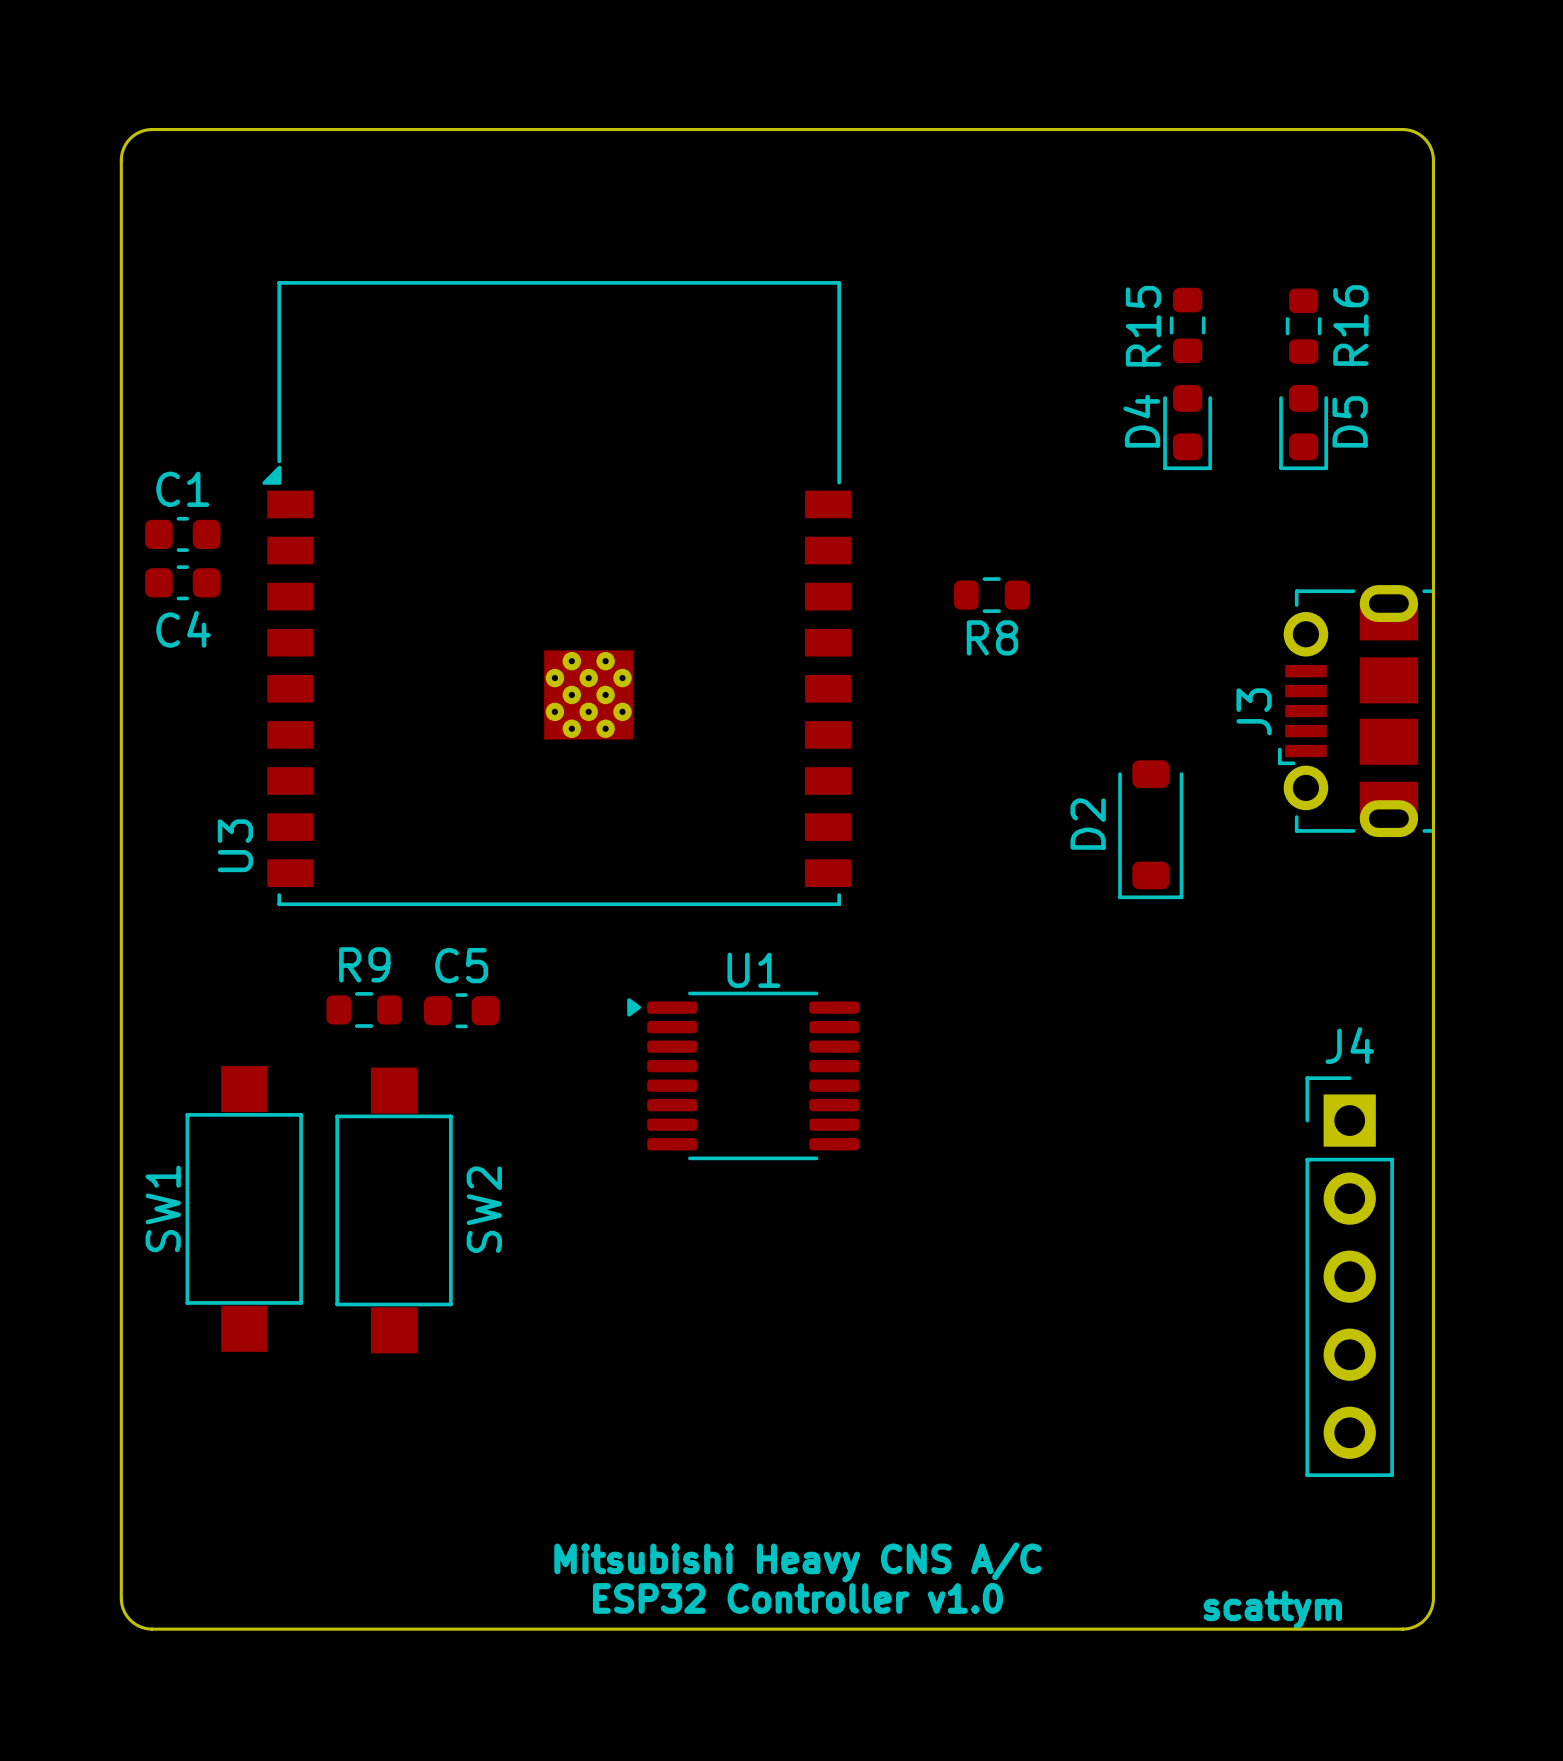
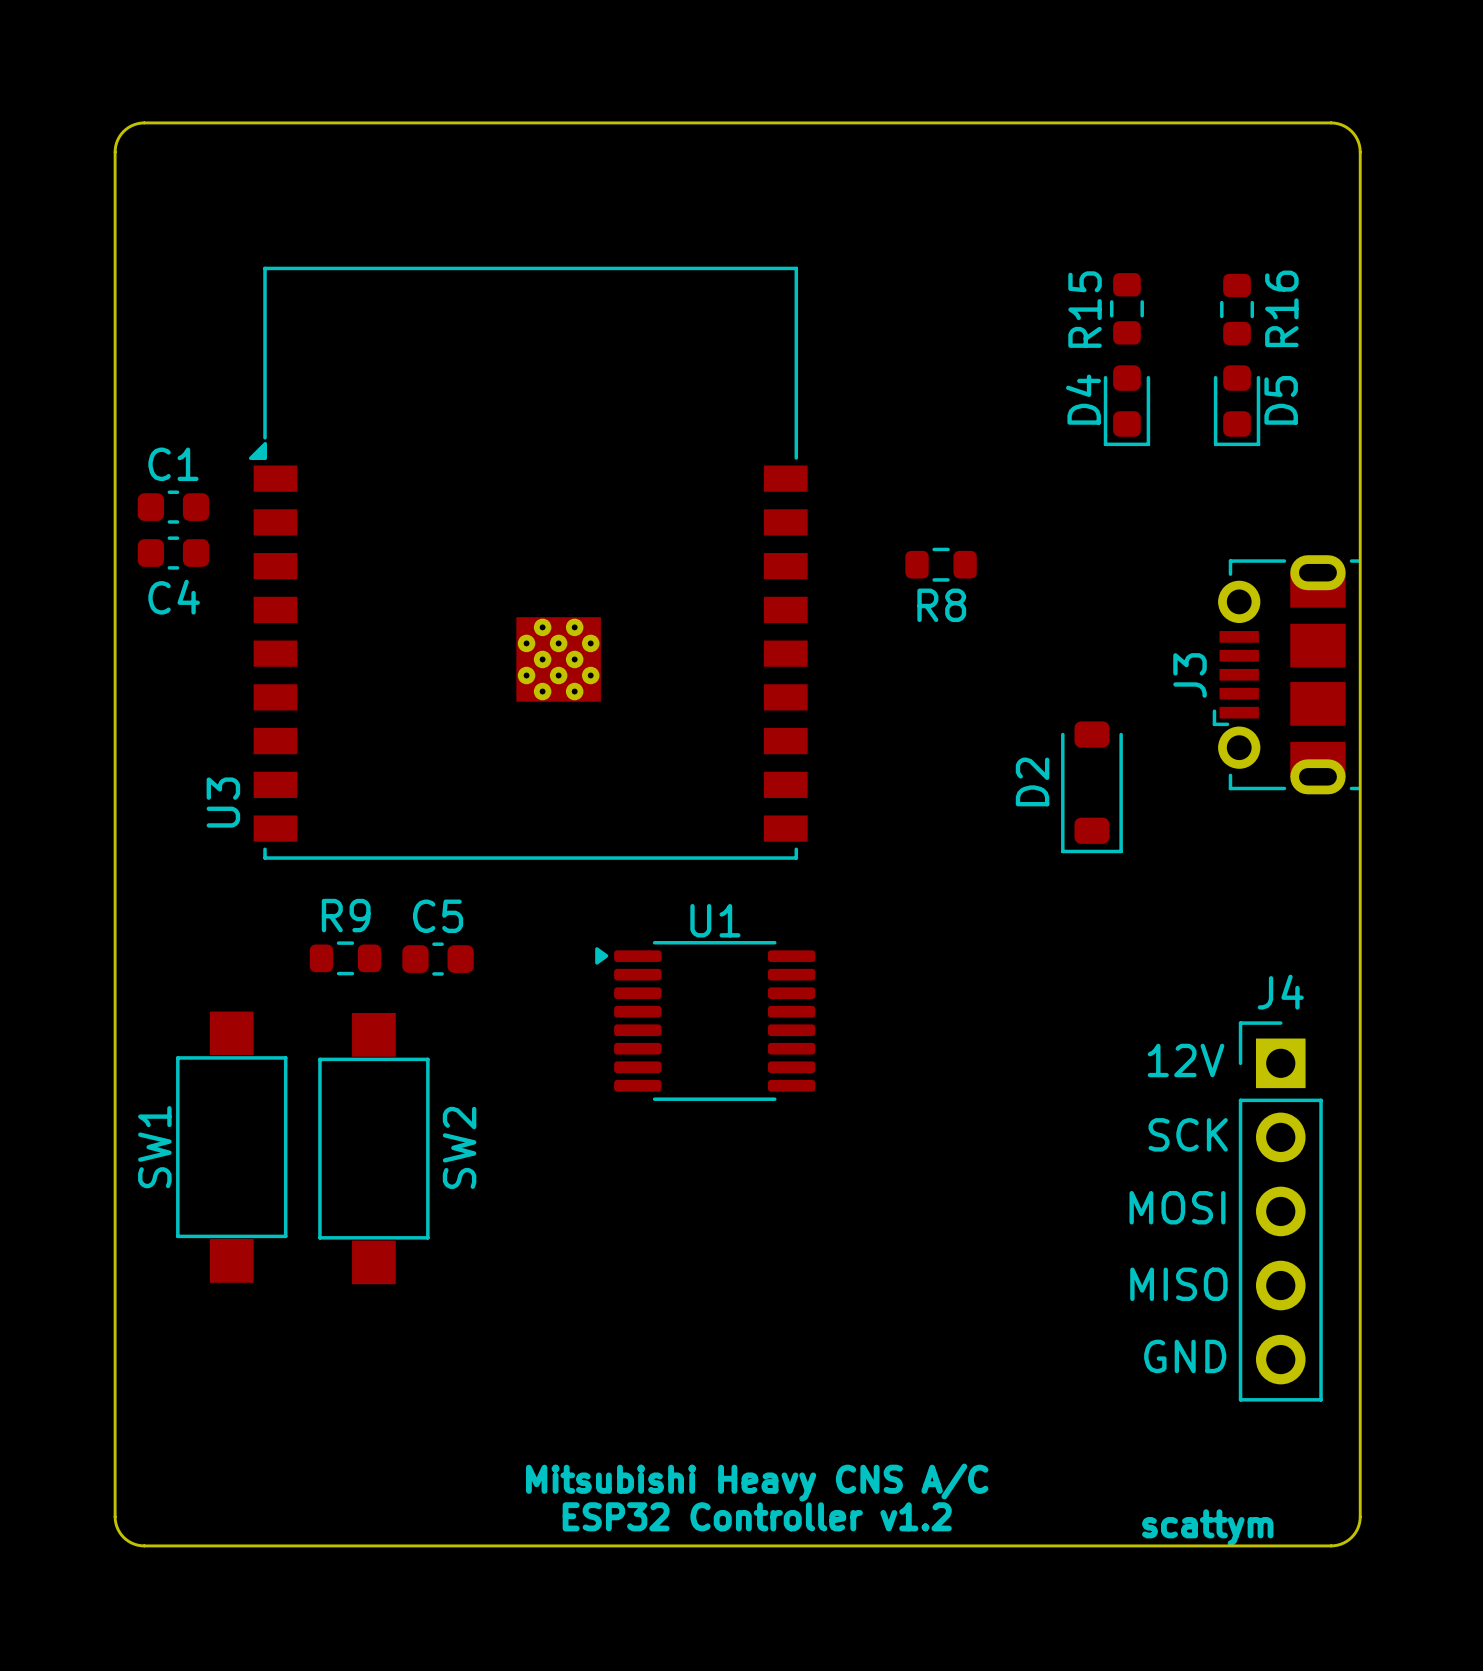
text: none -> 12V (1186, 1060)
text: none -> SCK (1188, 1134)
text: none -> MOSI (1177, 1207)
text: none -> MISO (1178, 1284)
text: none -> GND (1185, 1356)
text: ESP32 Controller v1.0 (797, 1598) -> ESP32 Controller v1.2 (757, 1516)

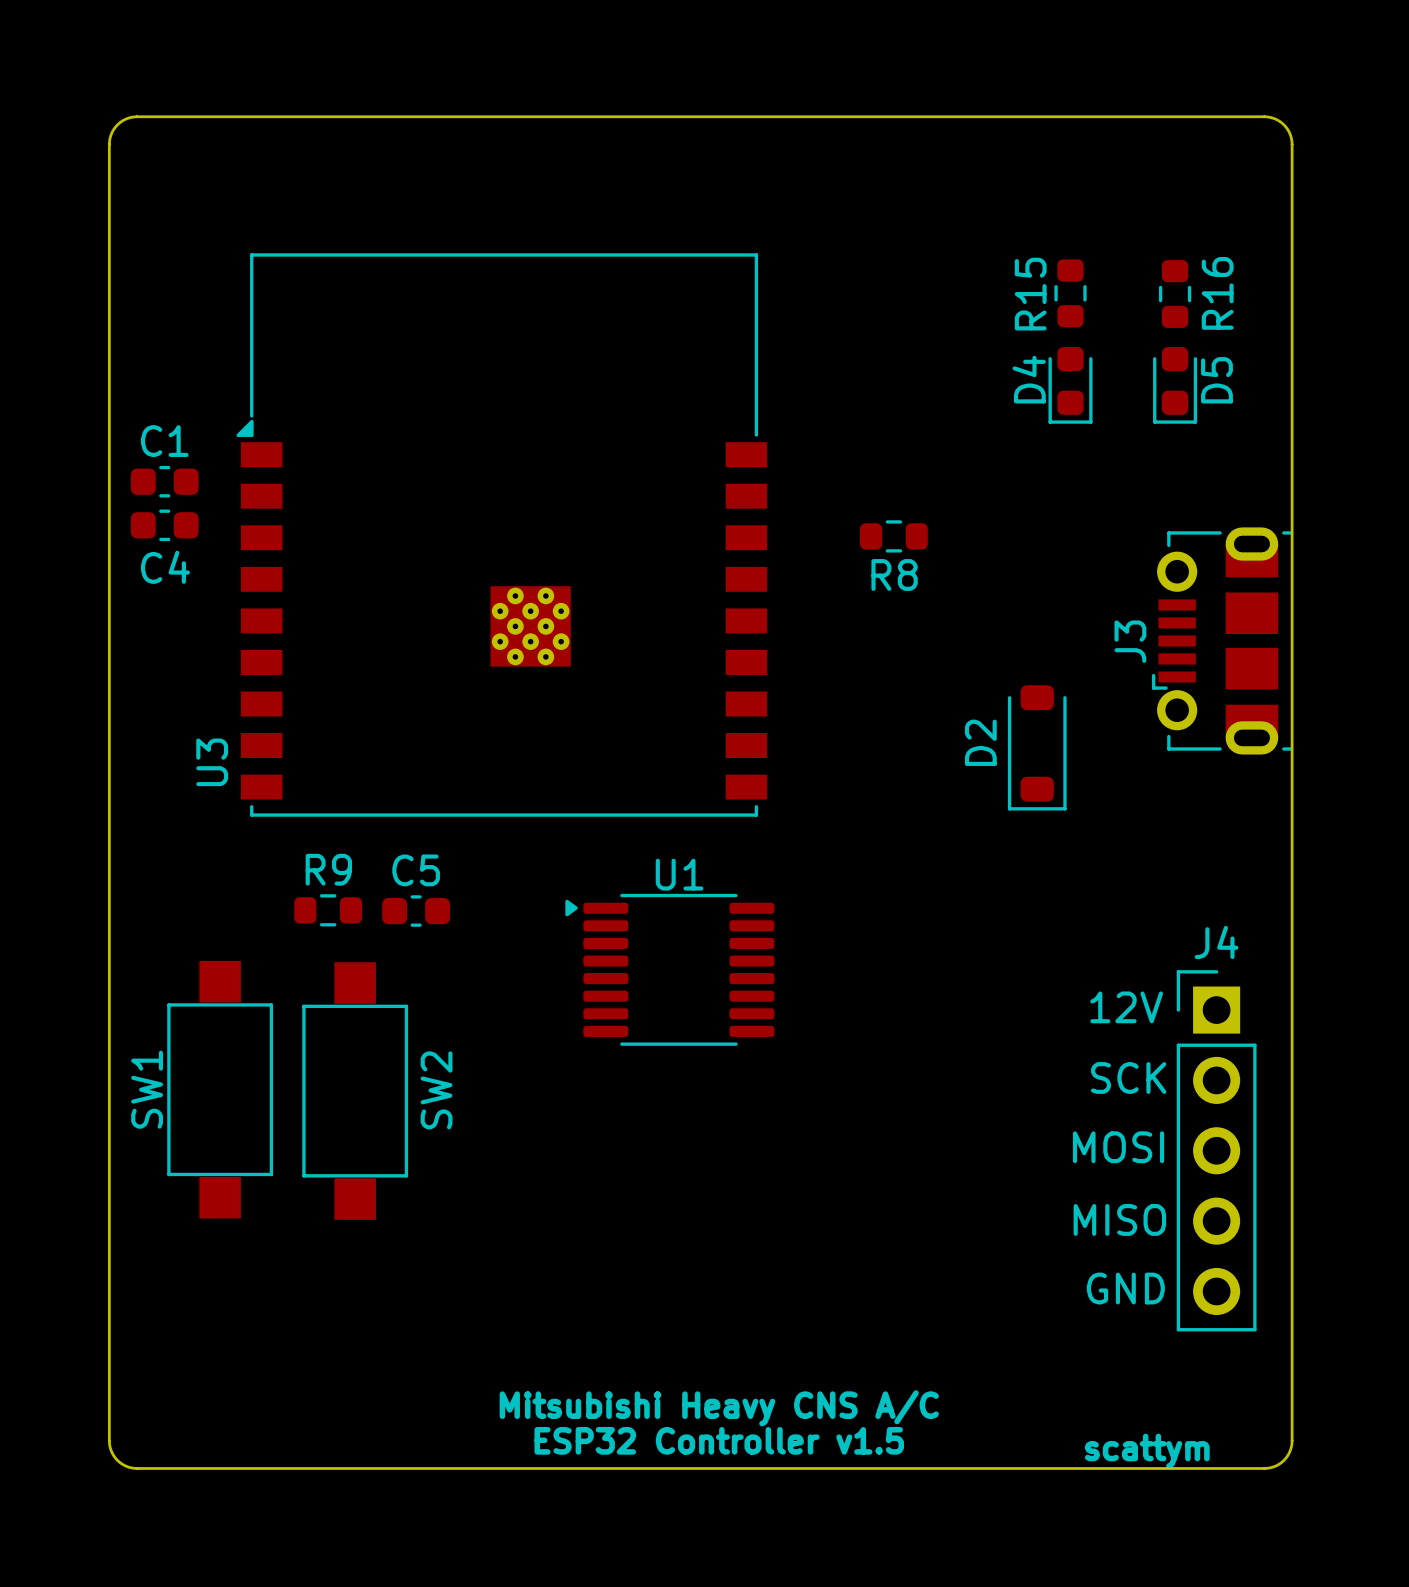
text: ESP32 Controller v1.2 (757, 1516) -> ESP32 Controller v1.5 (719, 1440)

